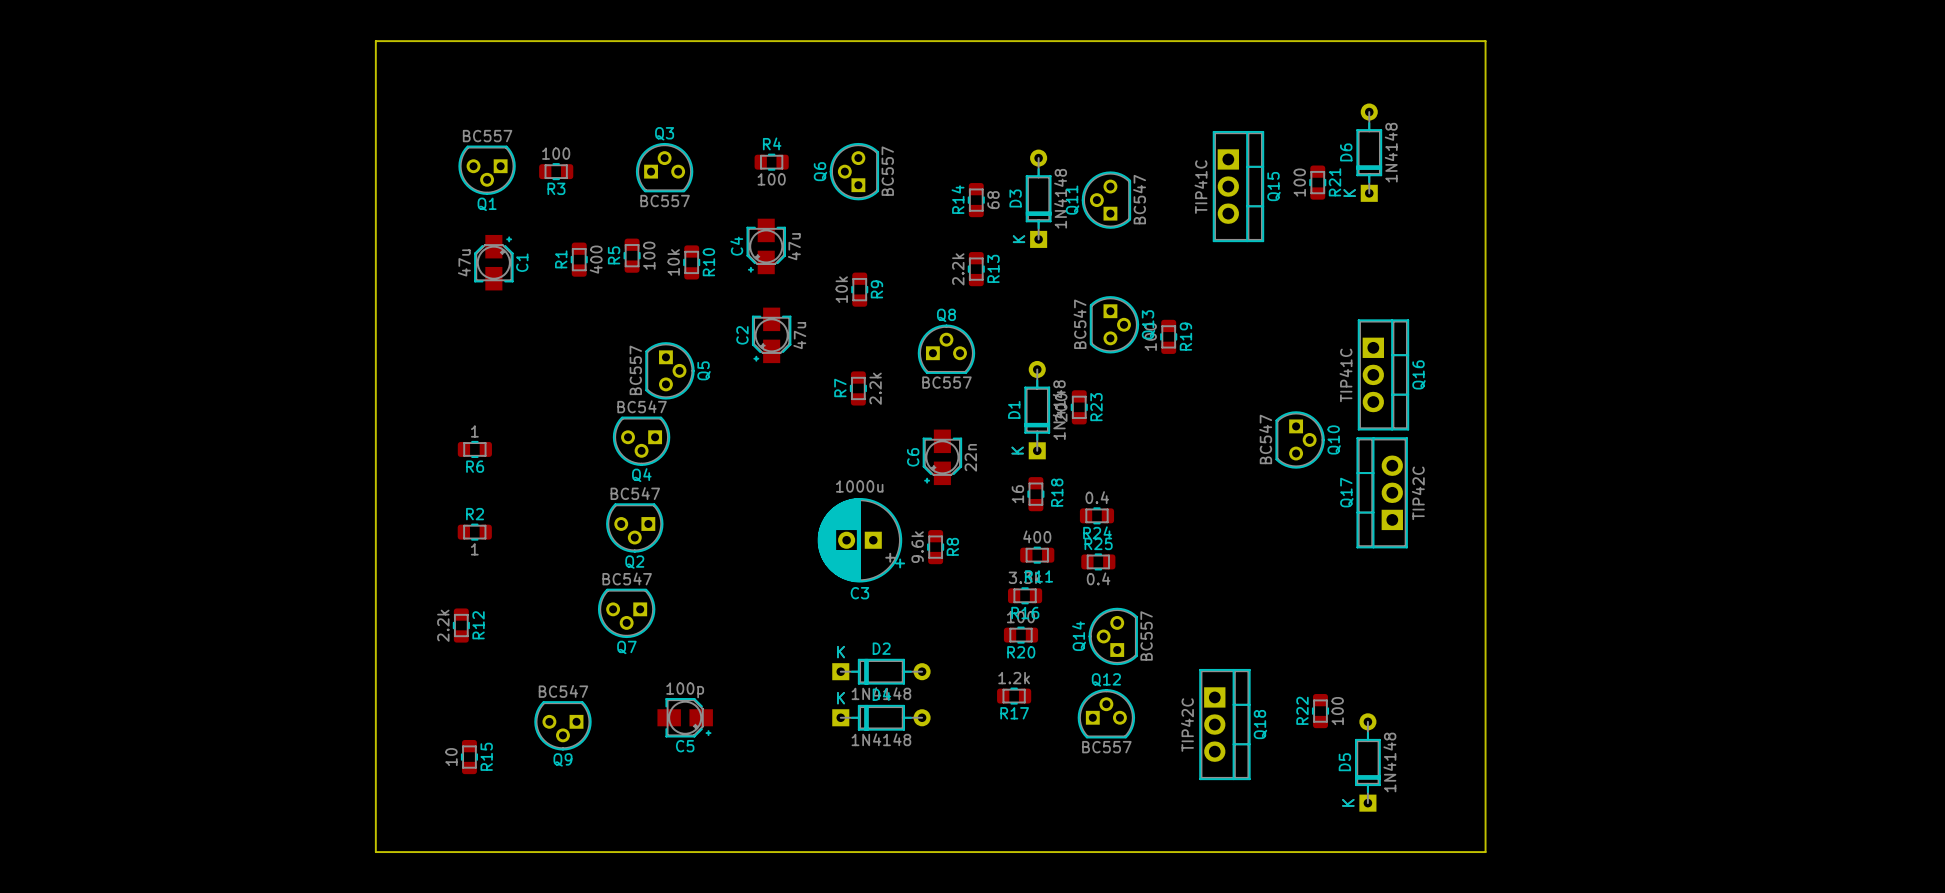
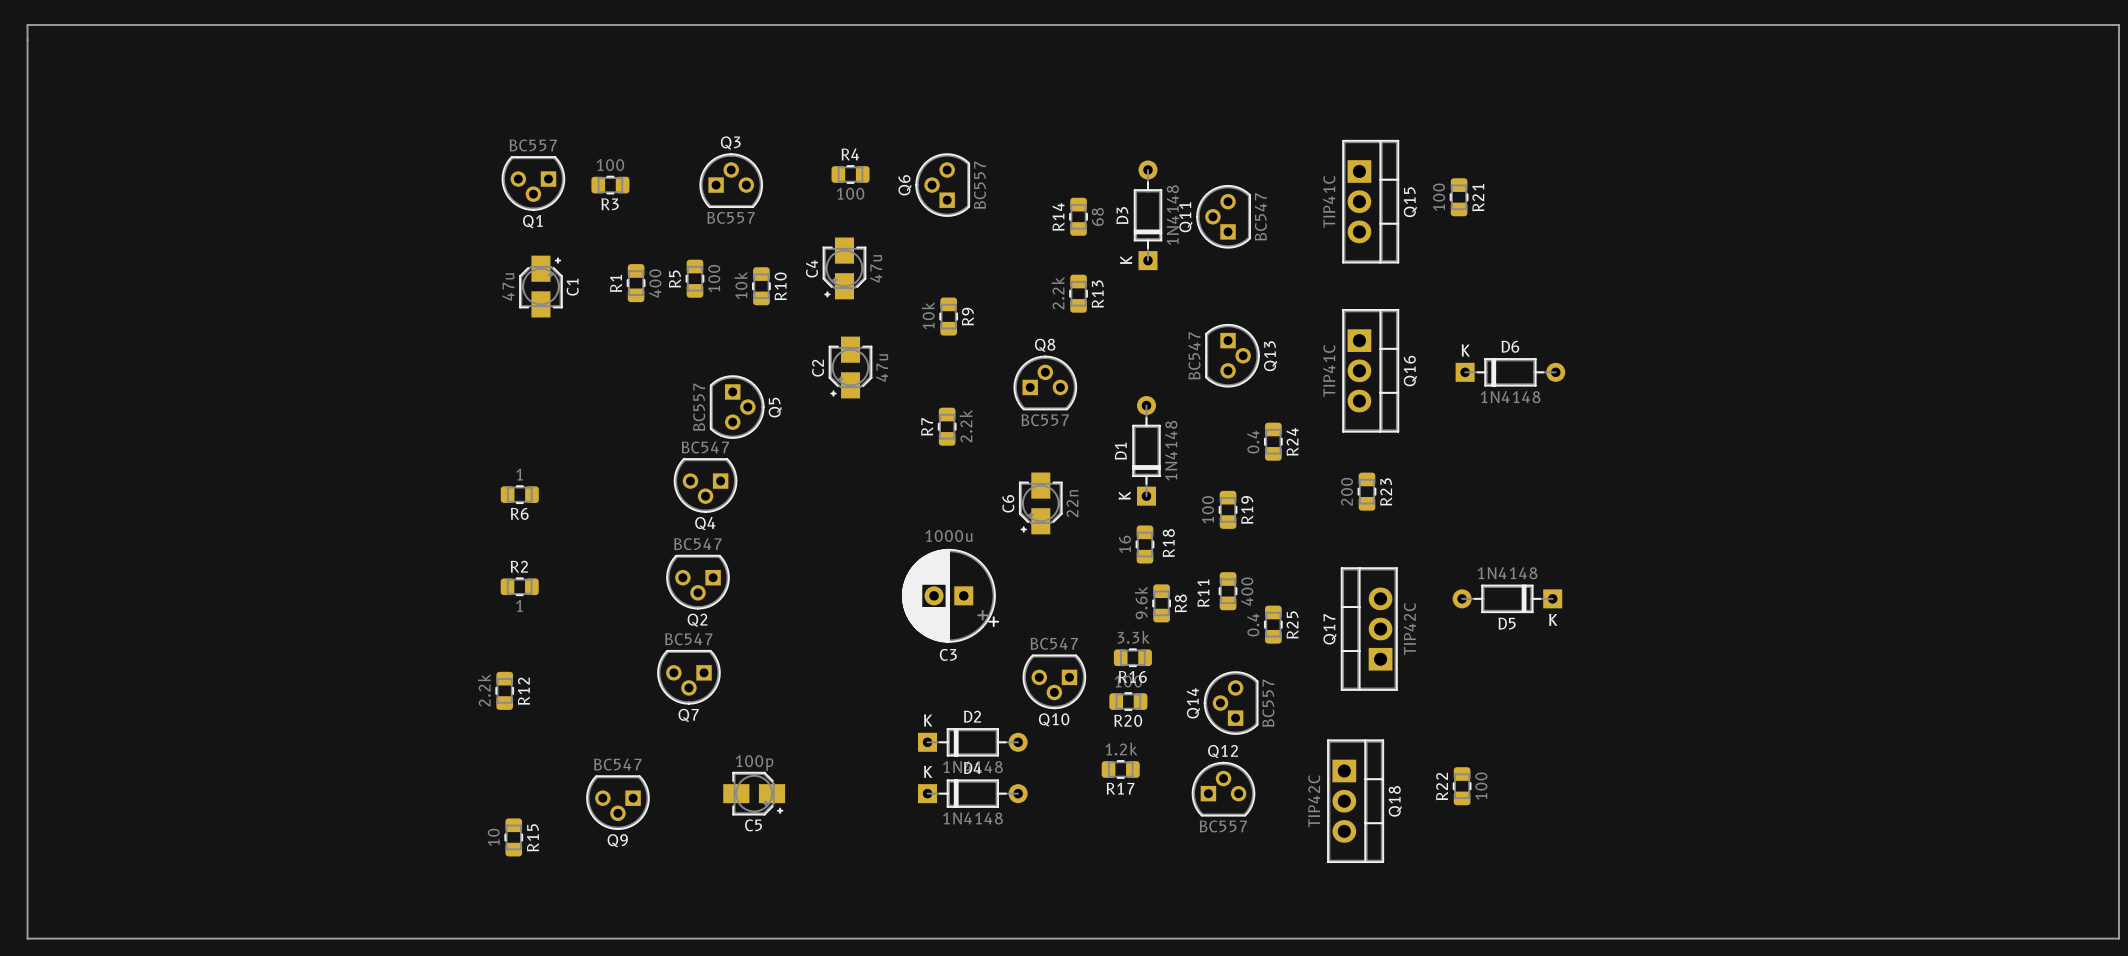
board edge: (375, 41) (1485, 41) (1485, 852) (375, 852) (375, 41) -> (27, 25) (27, 938) (2119, 938) (2119, 25) (27, 25)
D6 rotation: 0° (1369, 152) -> 90° clockwise (1510, 372)
D6 position: (1369, 152) -> (1510, 372)
R19 position: (1168, 336) -> (1228, 509)
Q16 position: (1383, 374) -> (1370, 370)
R23 position: (1079, 407) -> (1366, 491)
Q10 rotation: 0° (1300, 439) -> 90° clockwise (1054, 681)
Q10 position: (1300, 439) -> (1054, 681)
Q17 position: (1382, 492) -> (1369, 629)
R24 value position: 0.4 (1097, 497) -> 0.4 (1253, 442)
R24 rotation: 0° (1096, 515) -> 90° clockwise (1273, 441)
R24 position: (1096, 515) -> (1273, 441)
R24 name position: R24 (1097, 532) -> R24 (1292, 441)
R8 position: (935, 547) -> (1161, 603)
R11 rotation: 0° (1037, 555) -> 90° clockwise (1228, 591)
R11 position: (1037, 555) -> (1228, 591)
R25 rotation: 0° (1098, 561) -> 90° clockwise (1273, 624)
R25 position: (1098, 561) -> (1273, 624)
D5 rotation: 0° (1367, 762) -> 90° counterclockwise (1507, 598)
D5 position: (1367, 762) -> (1507, 598)

